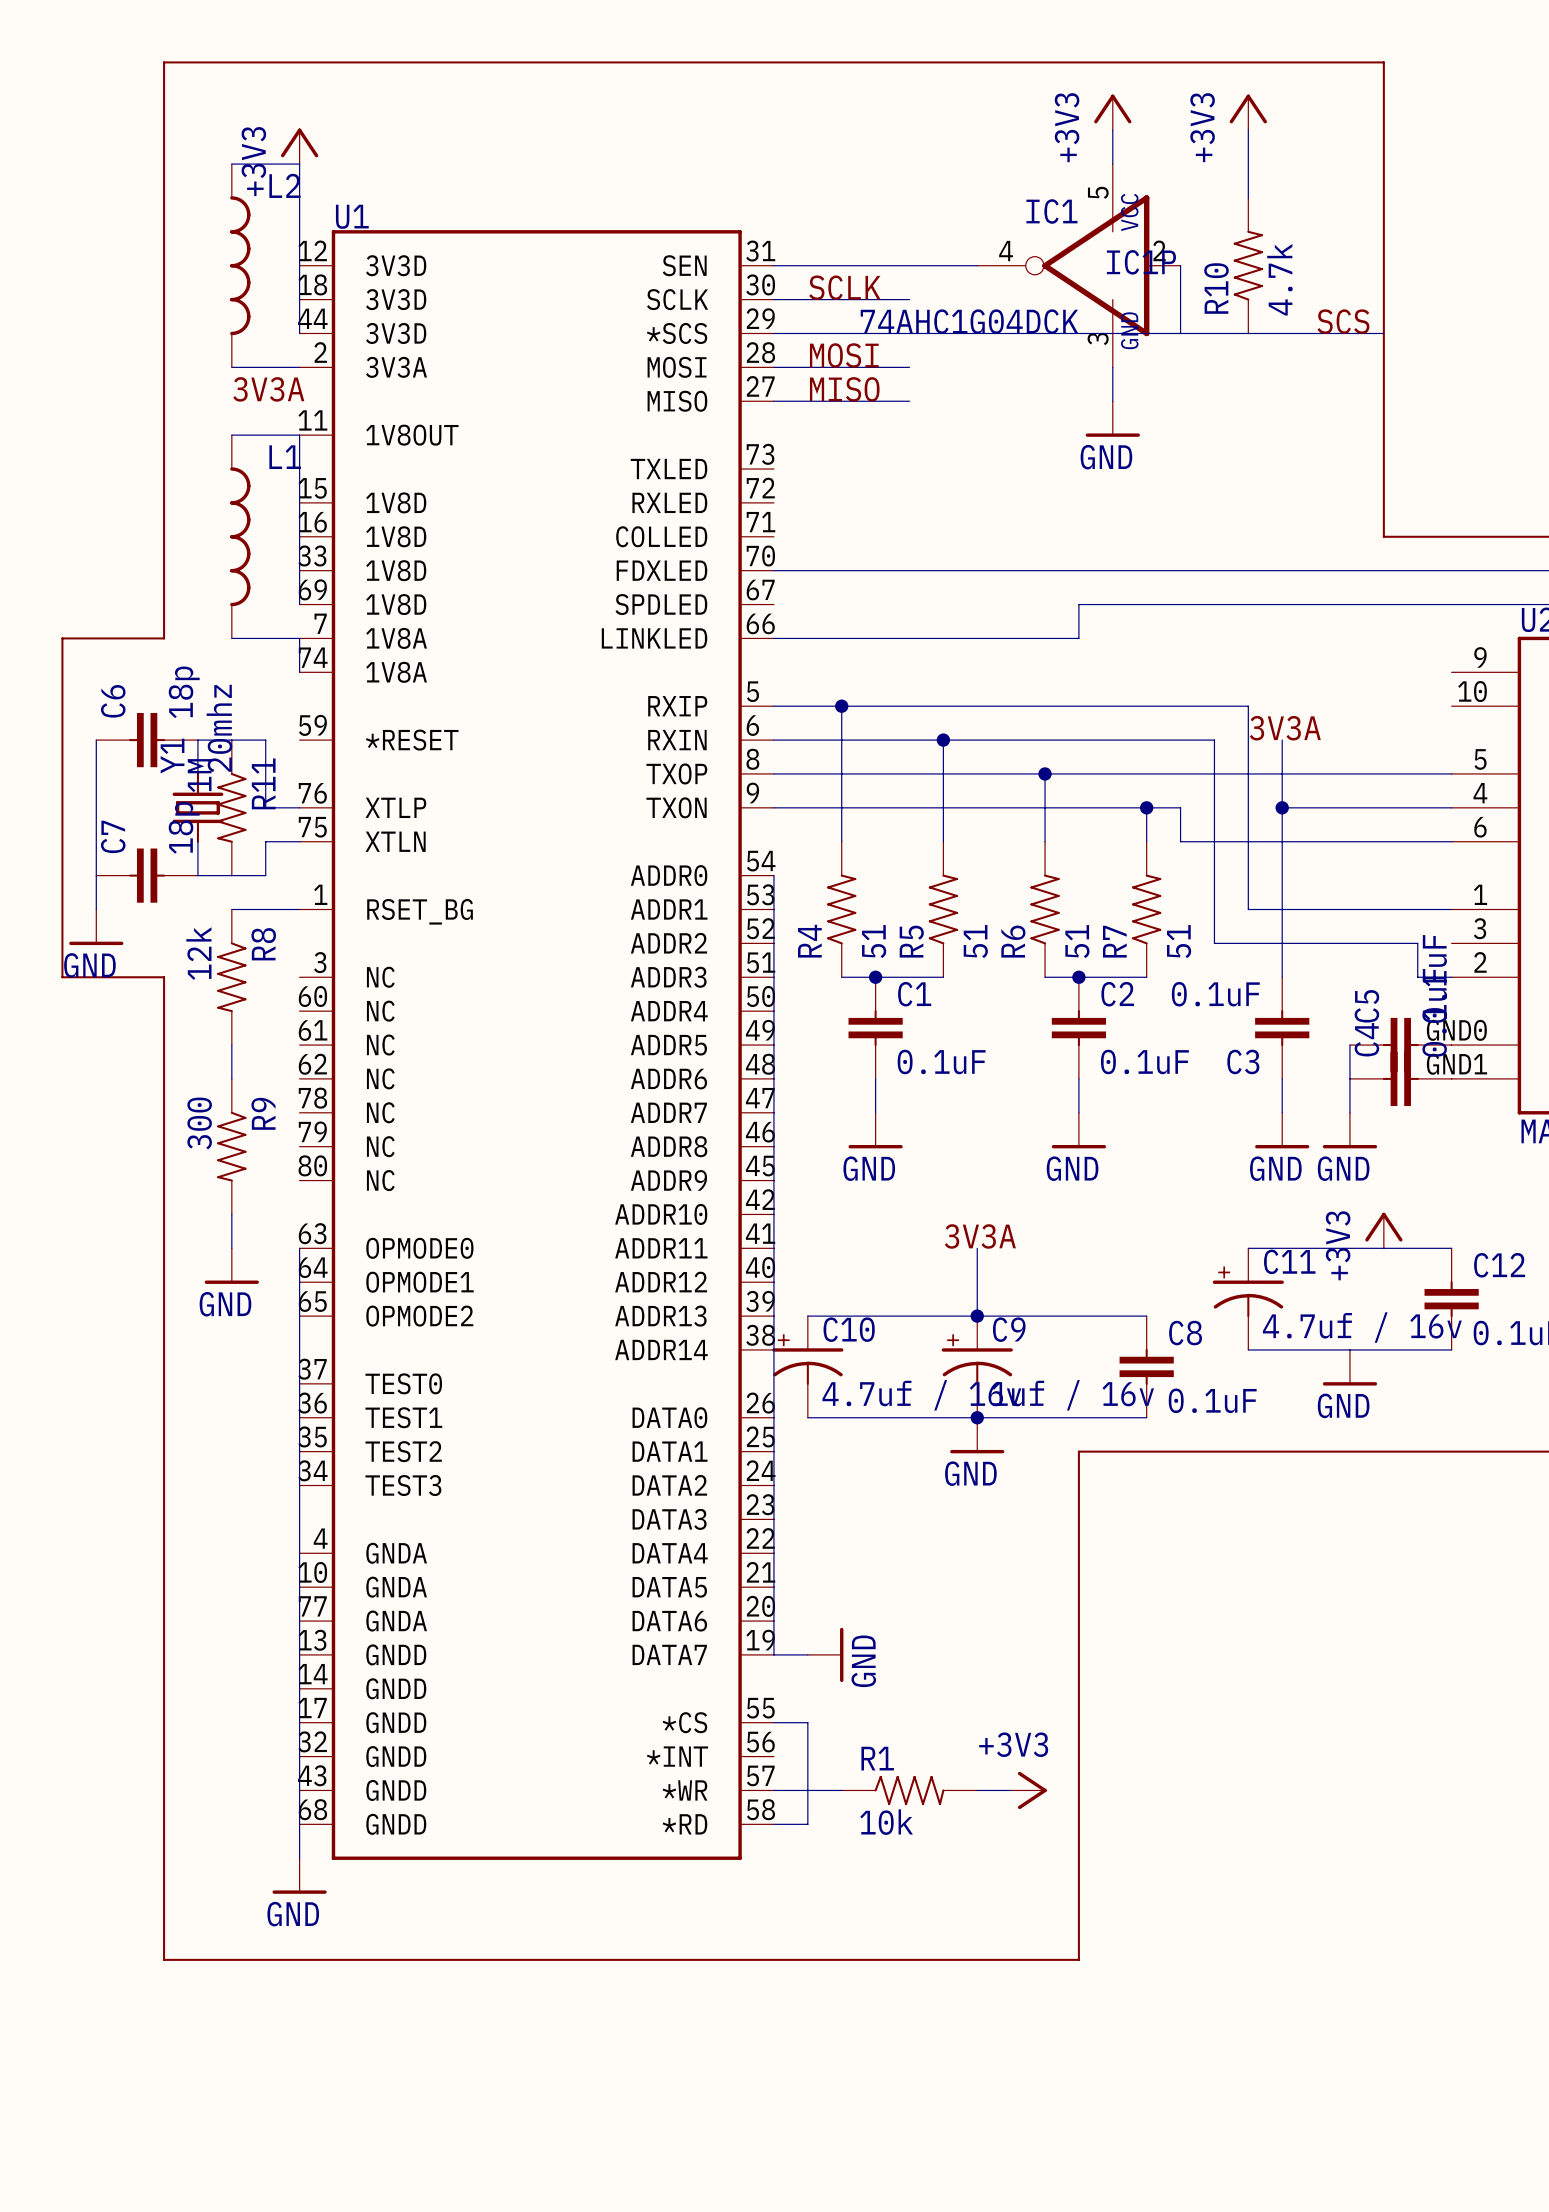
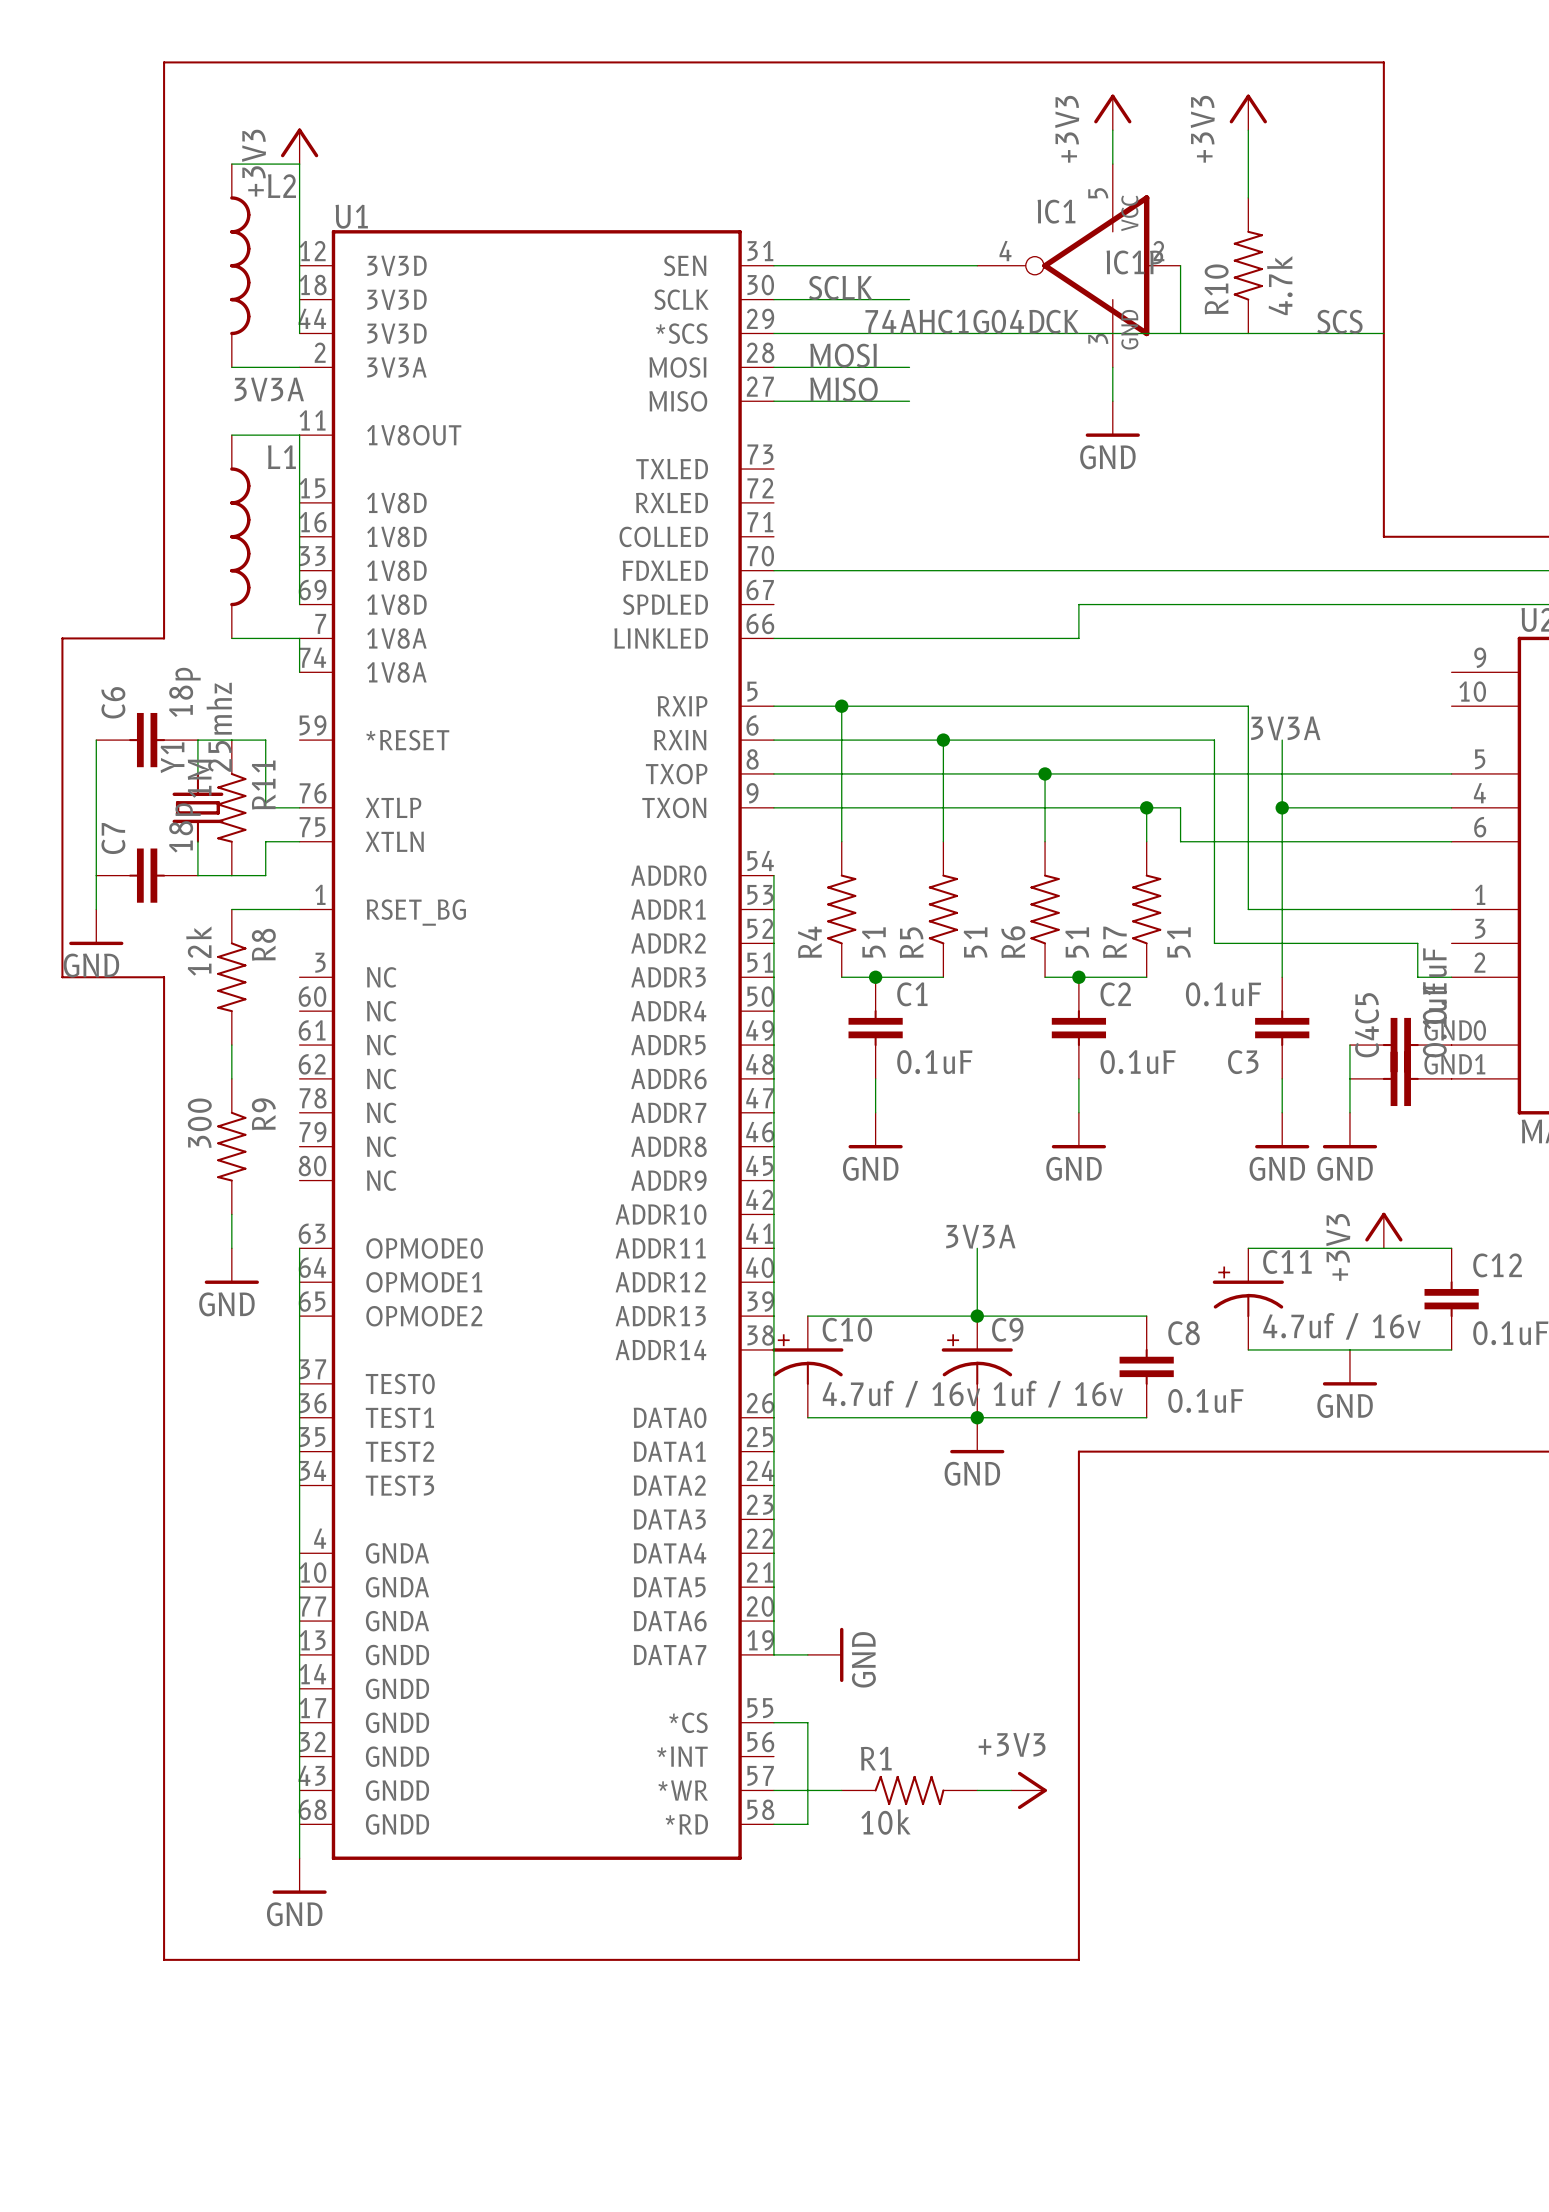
Y1 value: 20mhz (219, 728) -> 25mhz (219, 727)

